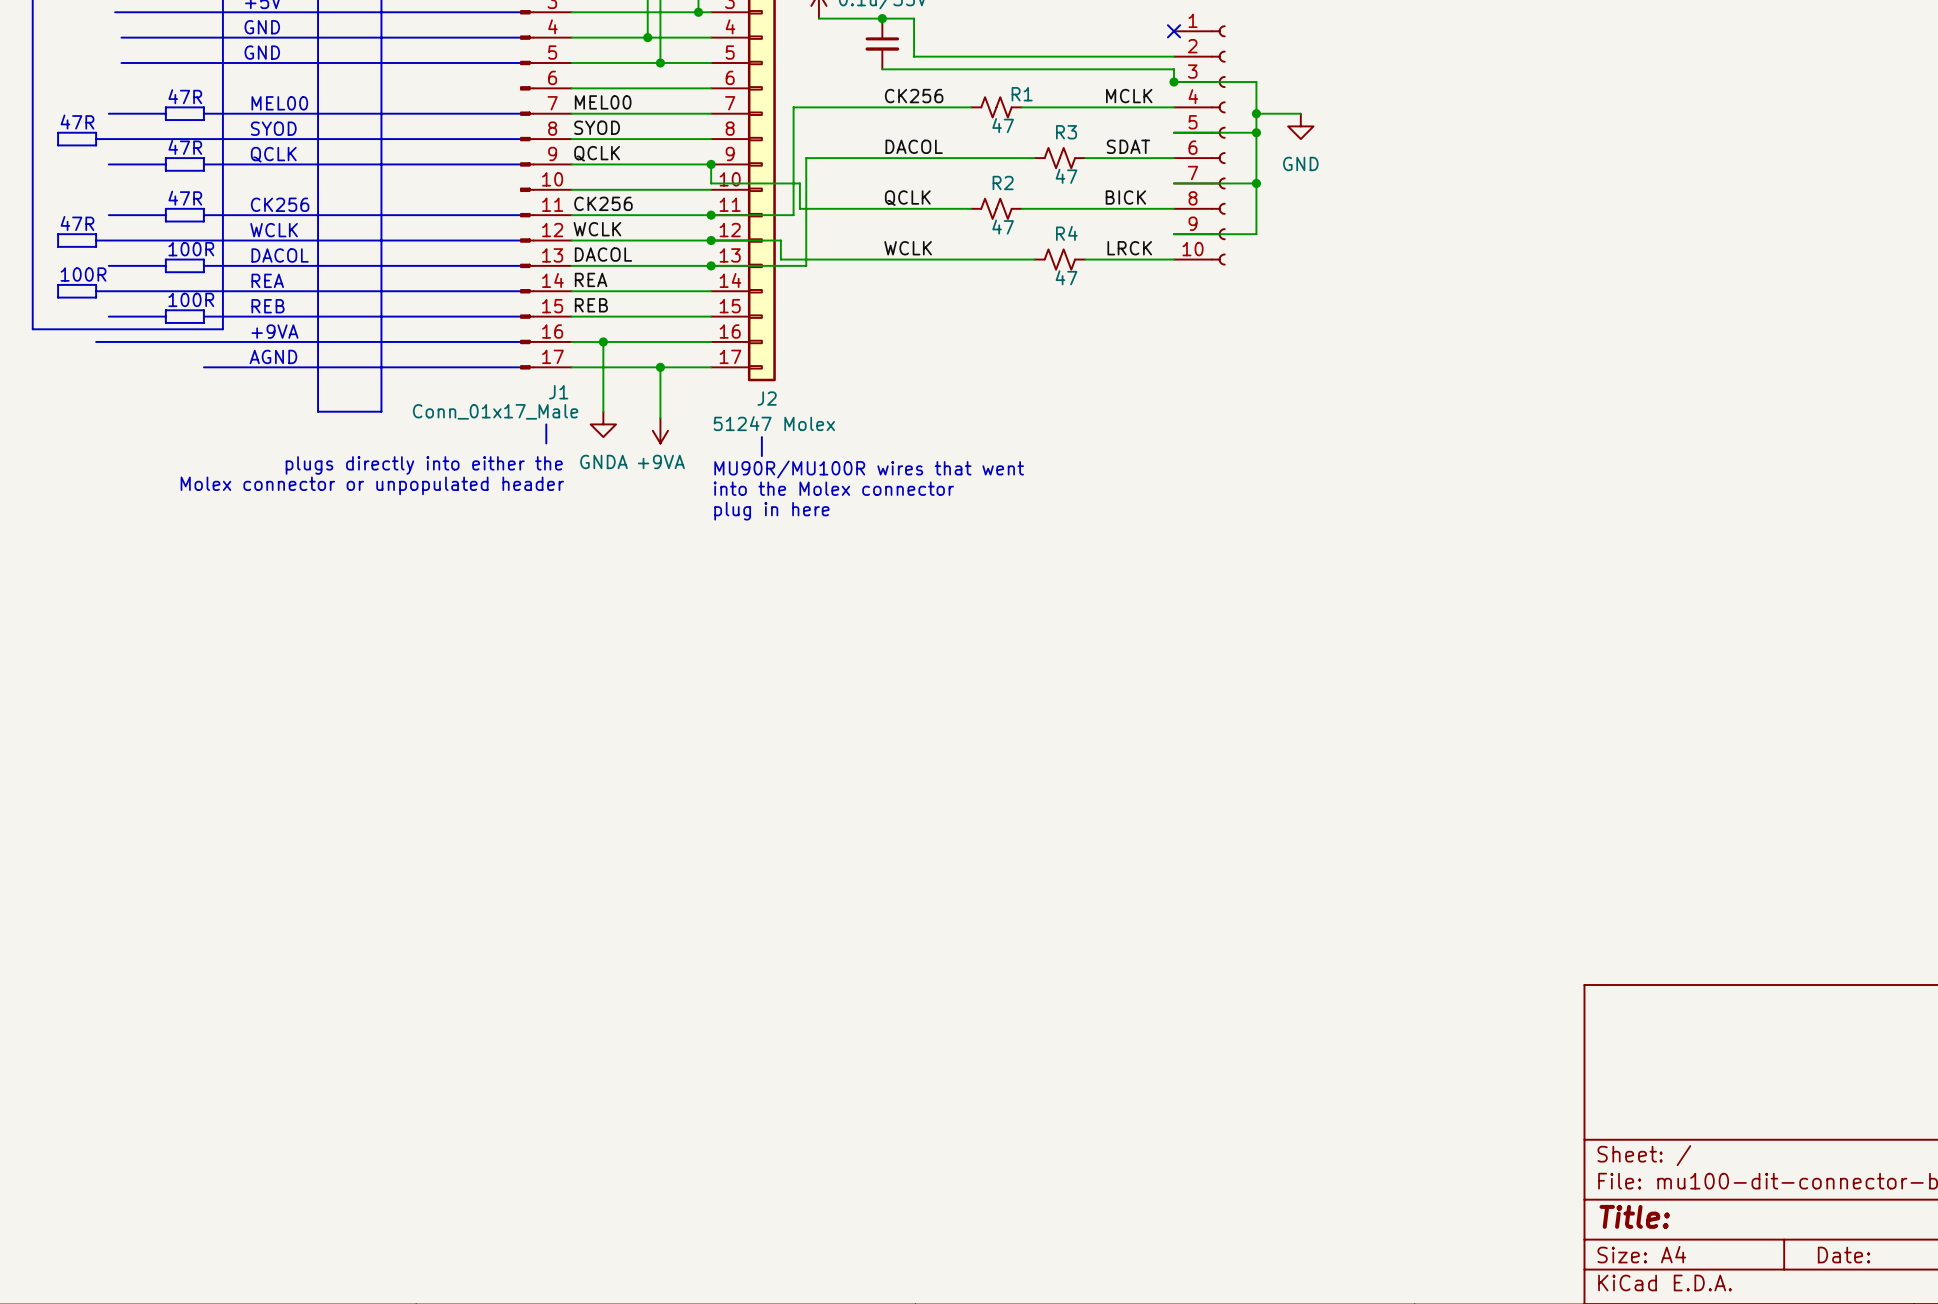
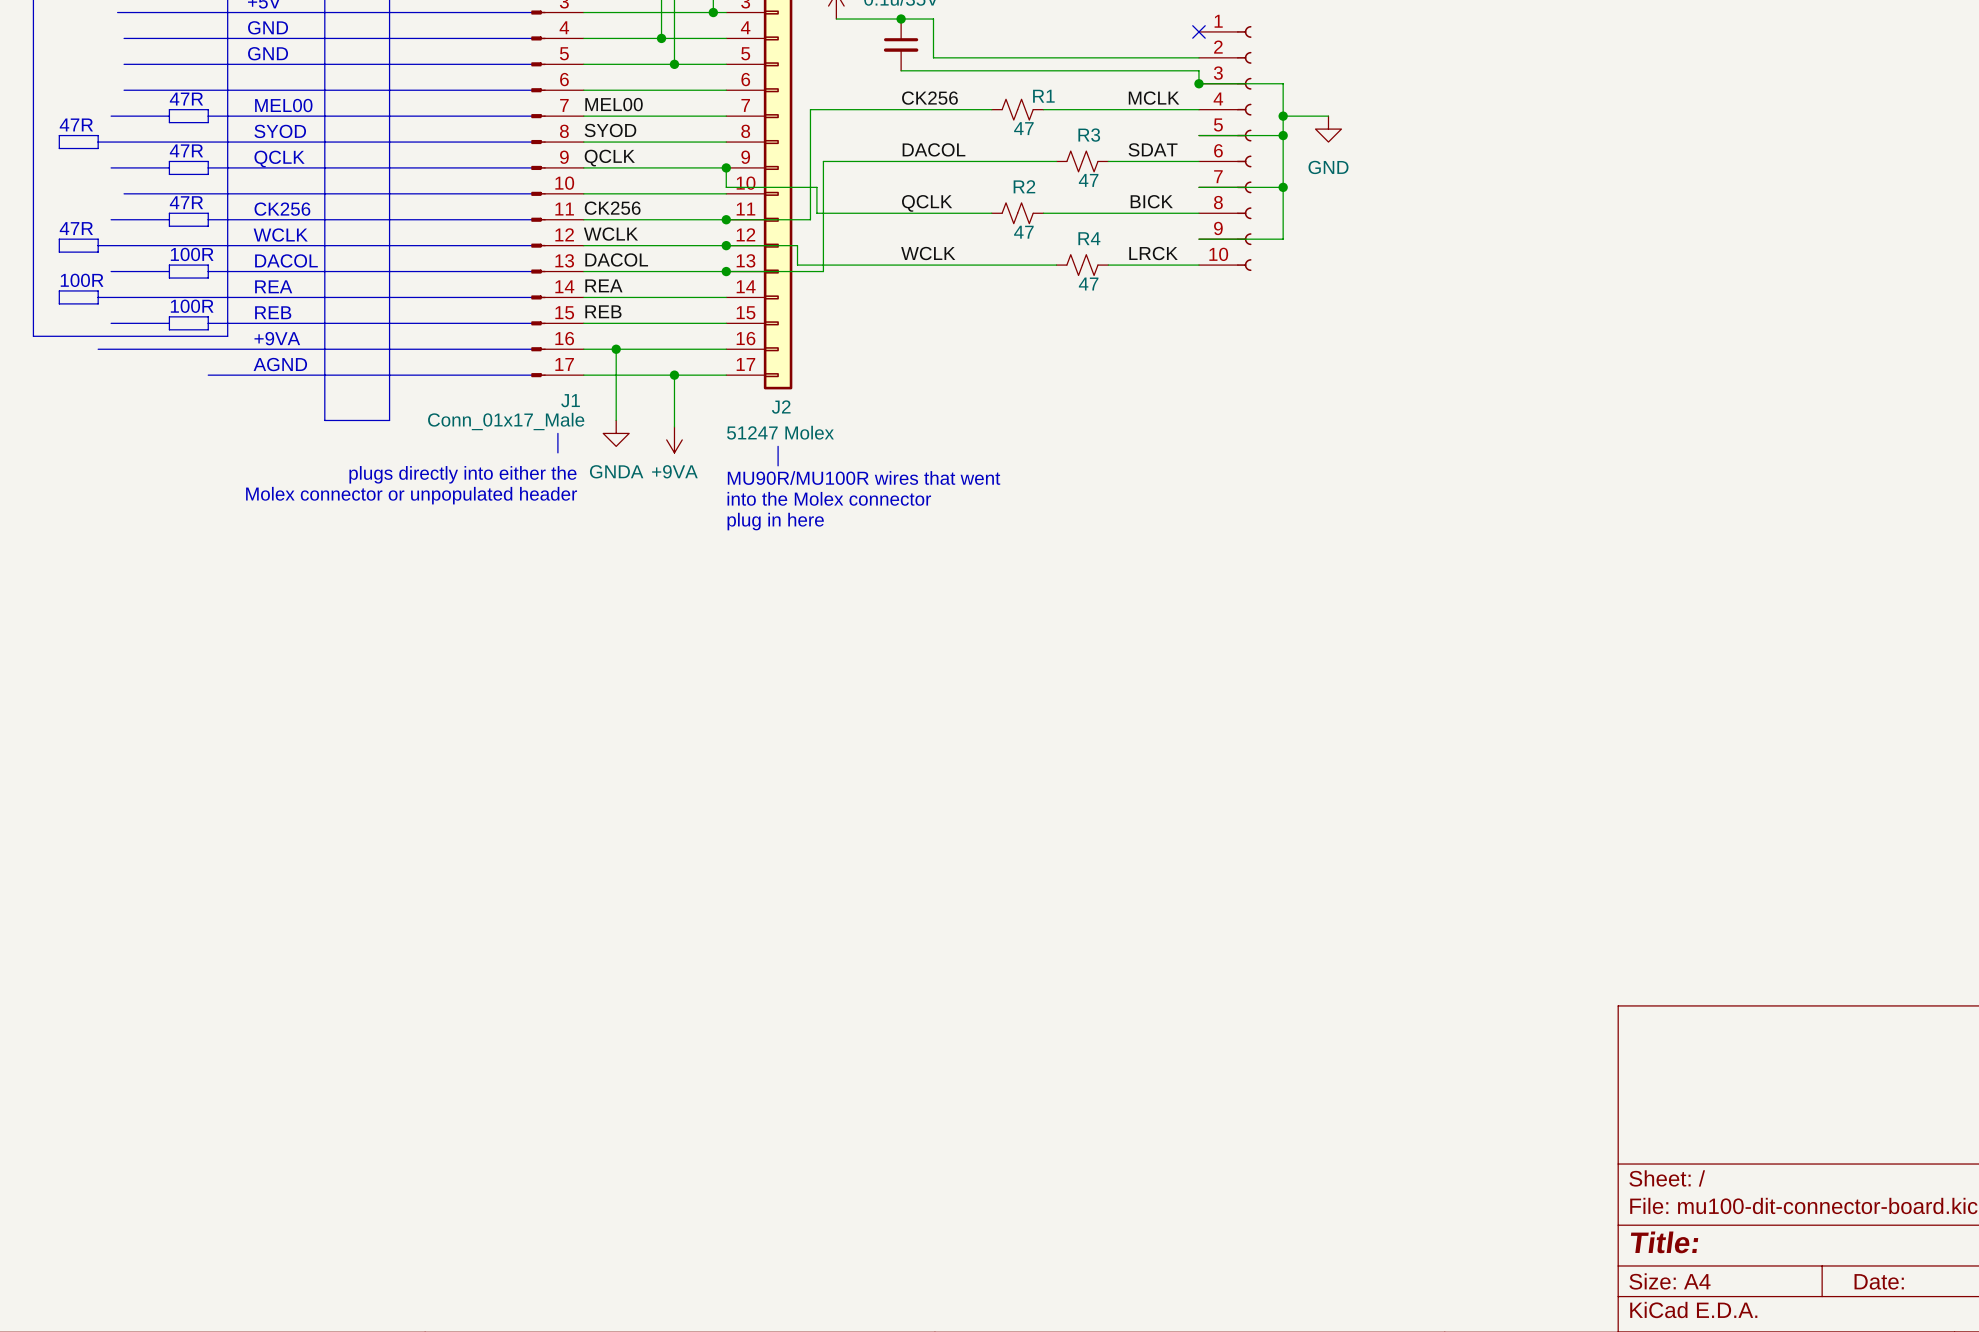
line: none -> (124, 90) (538, 90)
line: none -> (124, 193) (538, 193)

